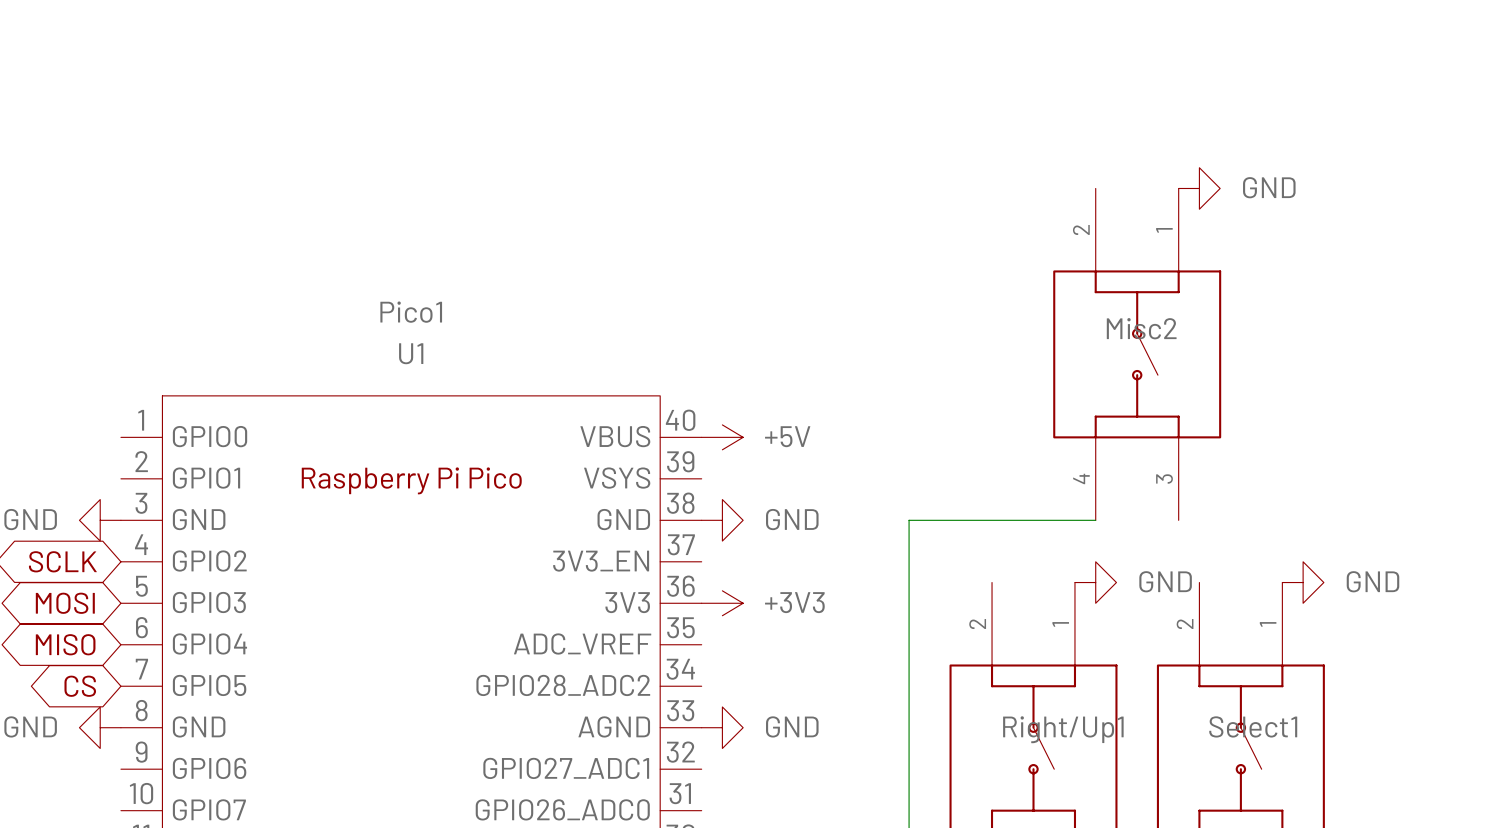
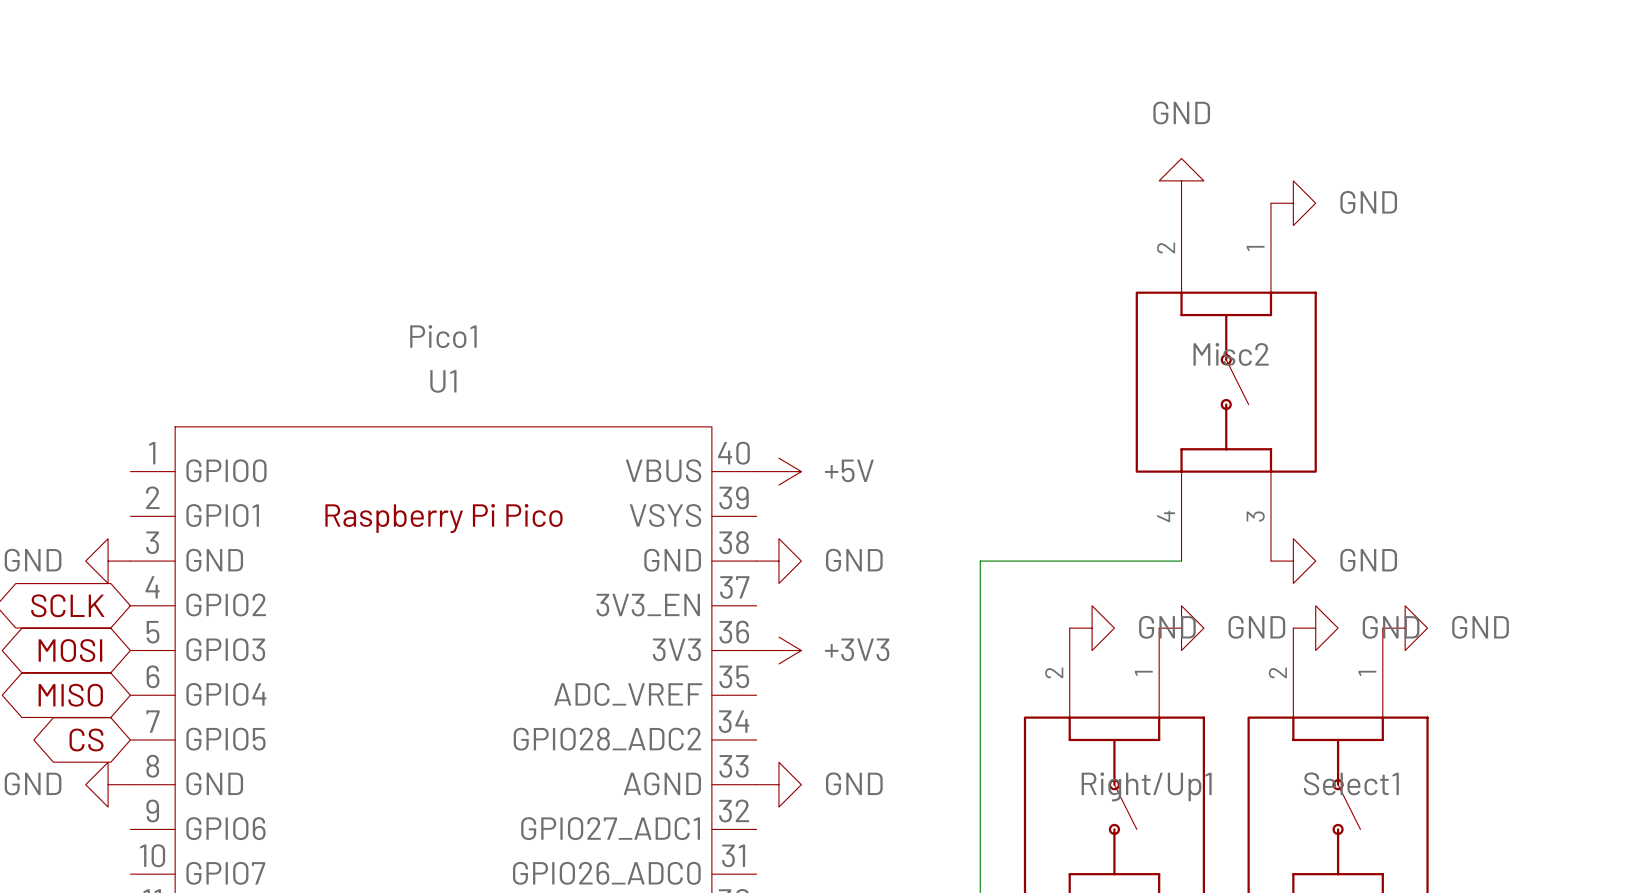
power symbol: none -> GND (1181, 180)
power symbol: none -> GND (1293, 561)
power symbol: none -> GND (1092, 628)
power symbol: none -> GND (1315, 628)

